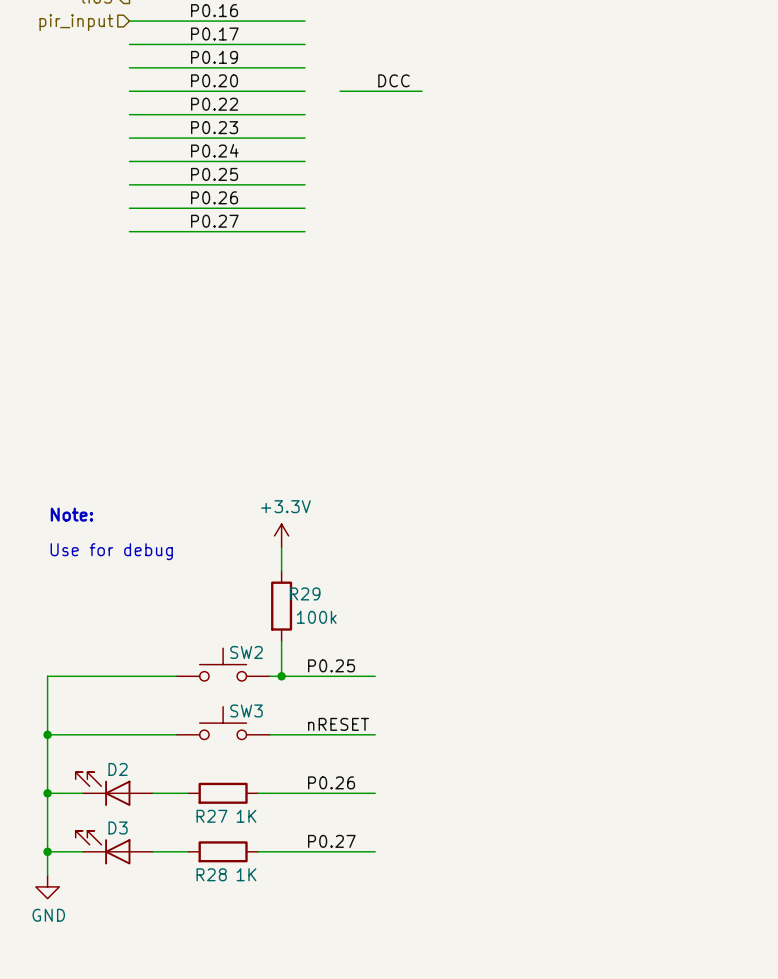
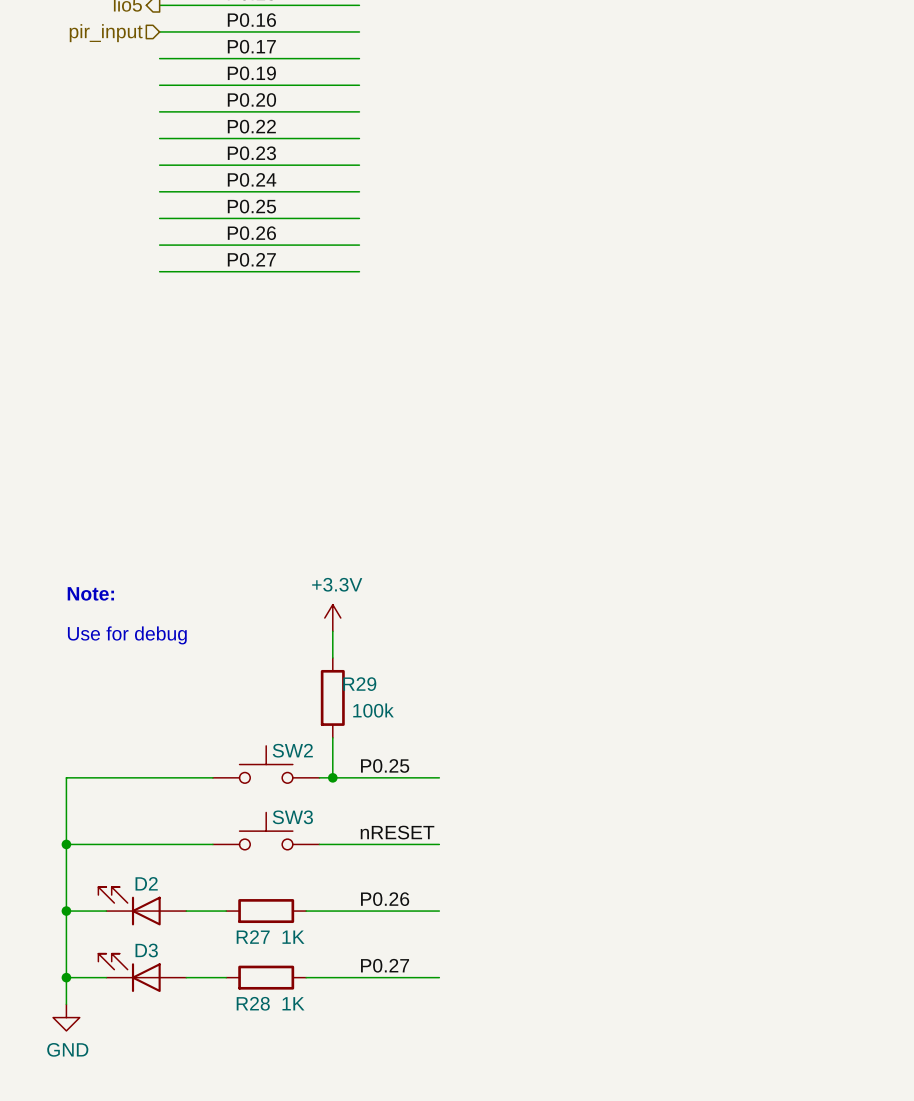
label: DCC (393, 80) -> none
wire: (340, 91) (422, 91) -> none

